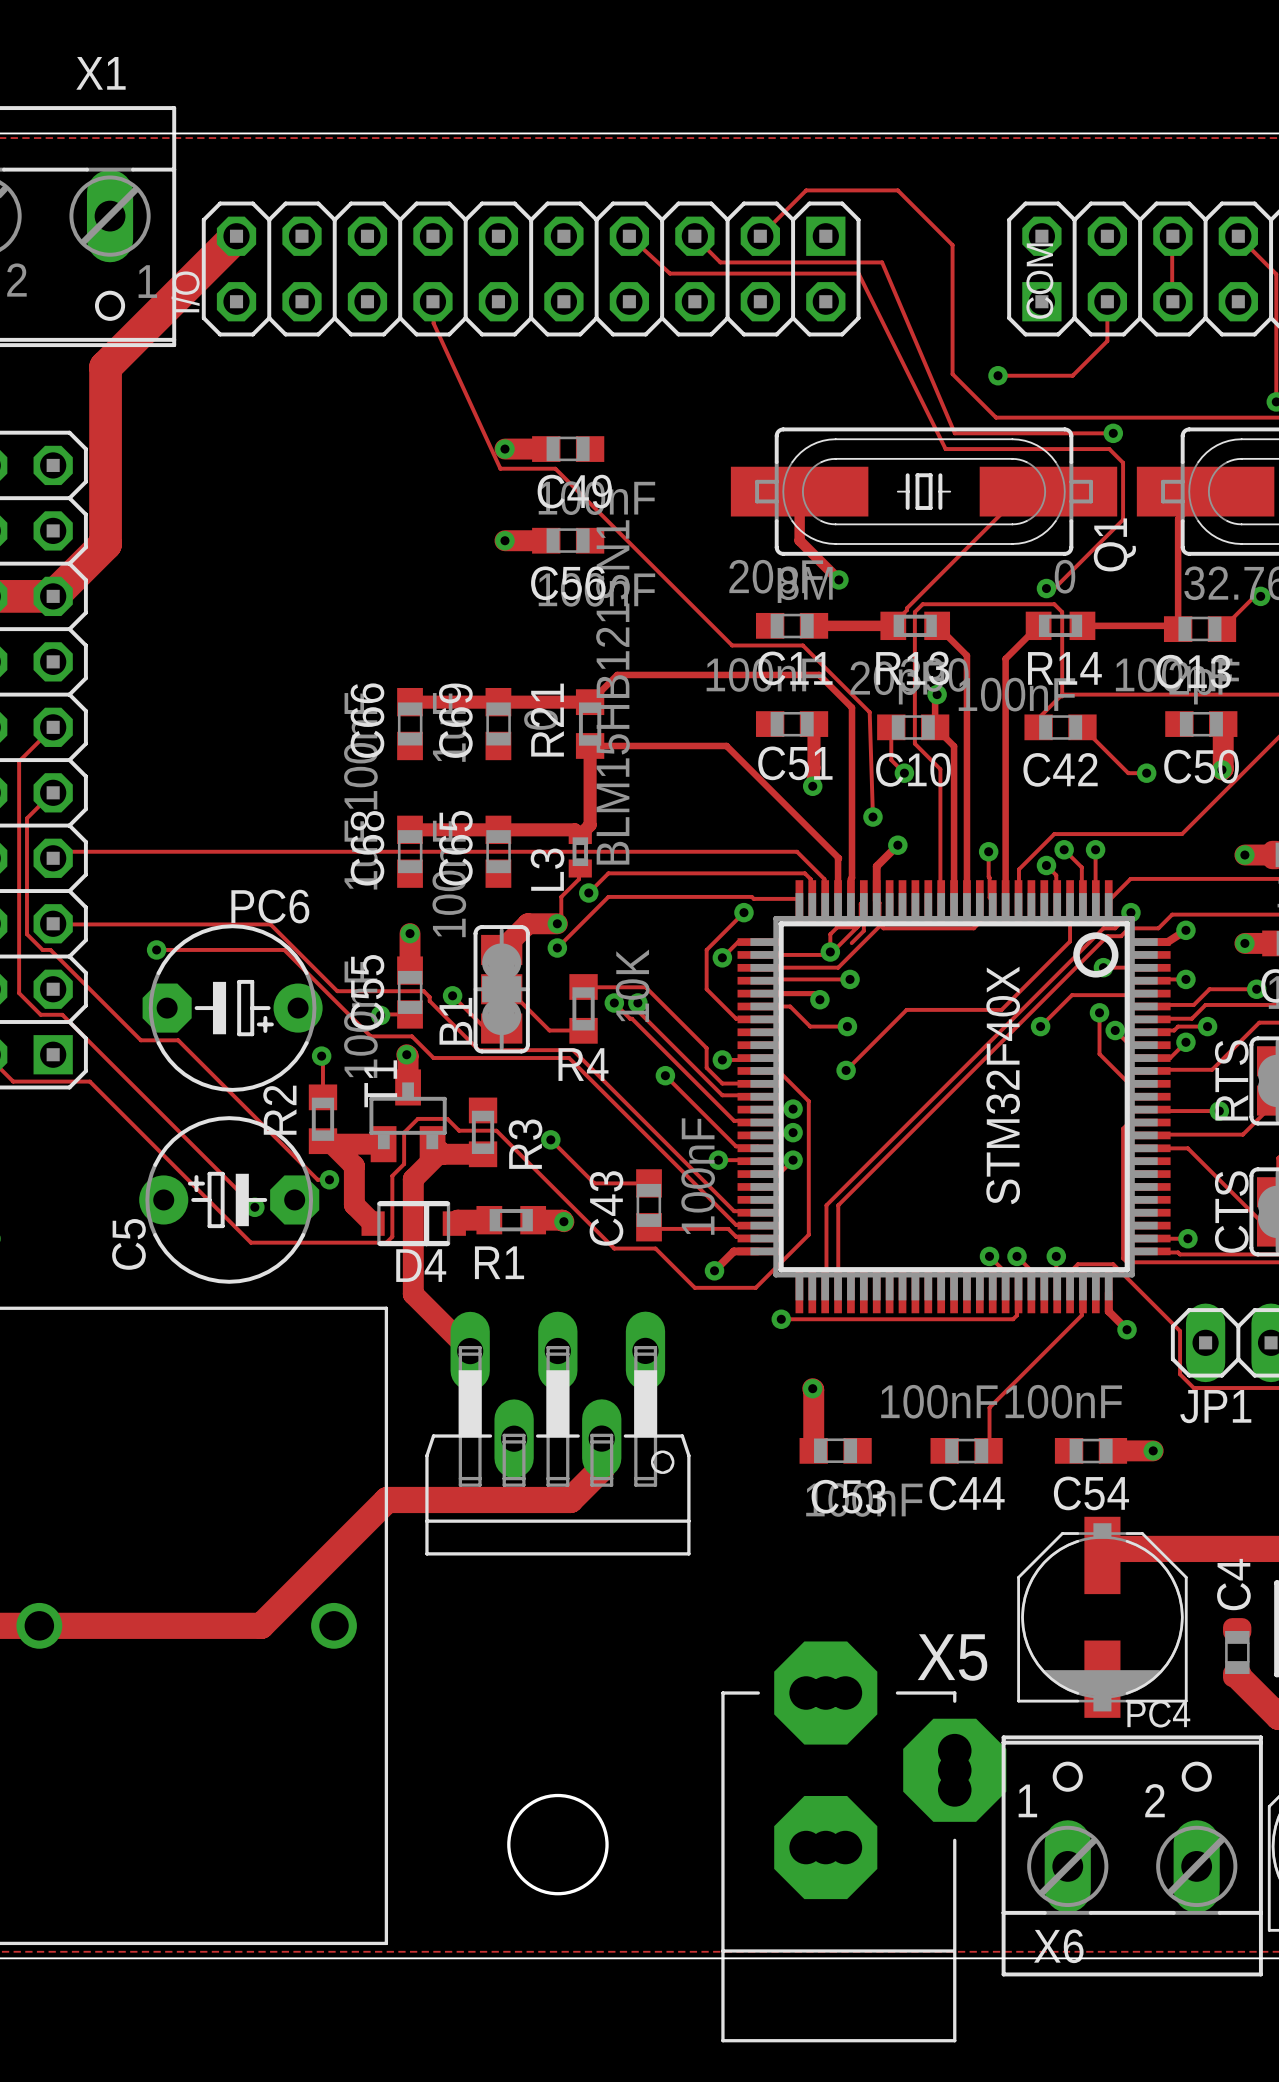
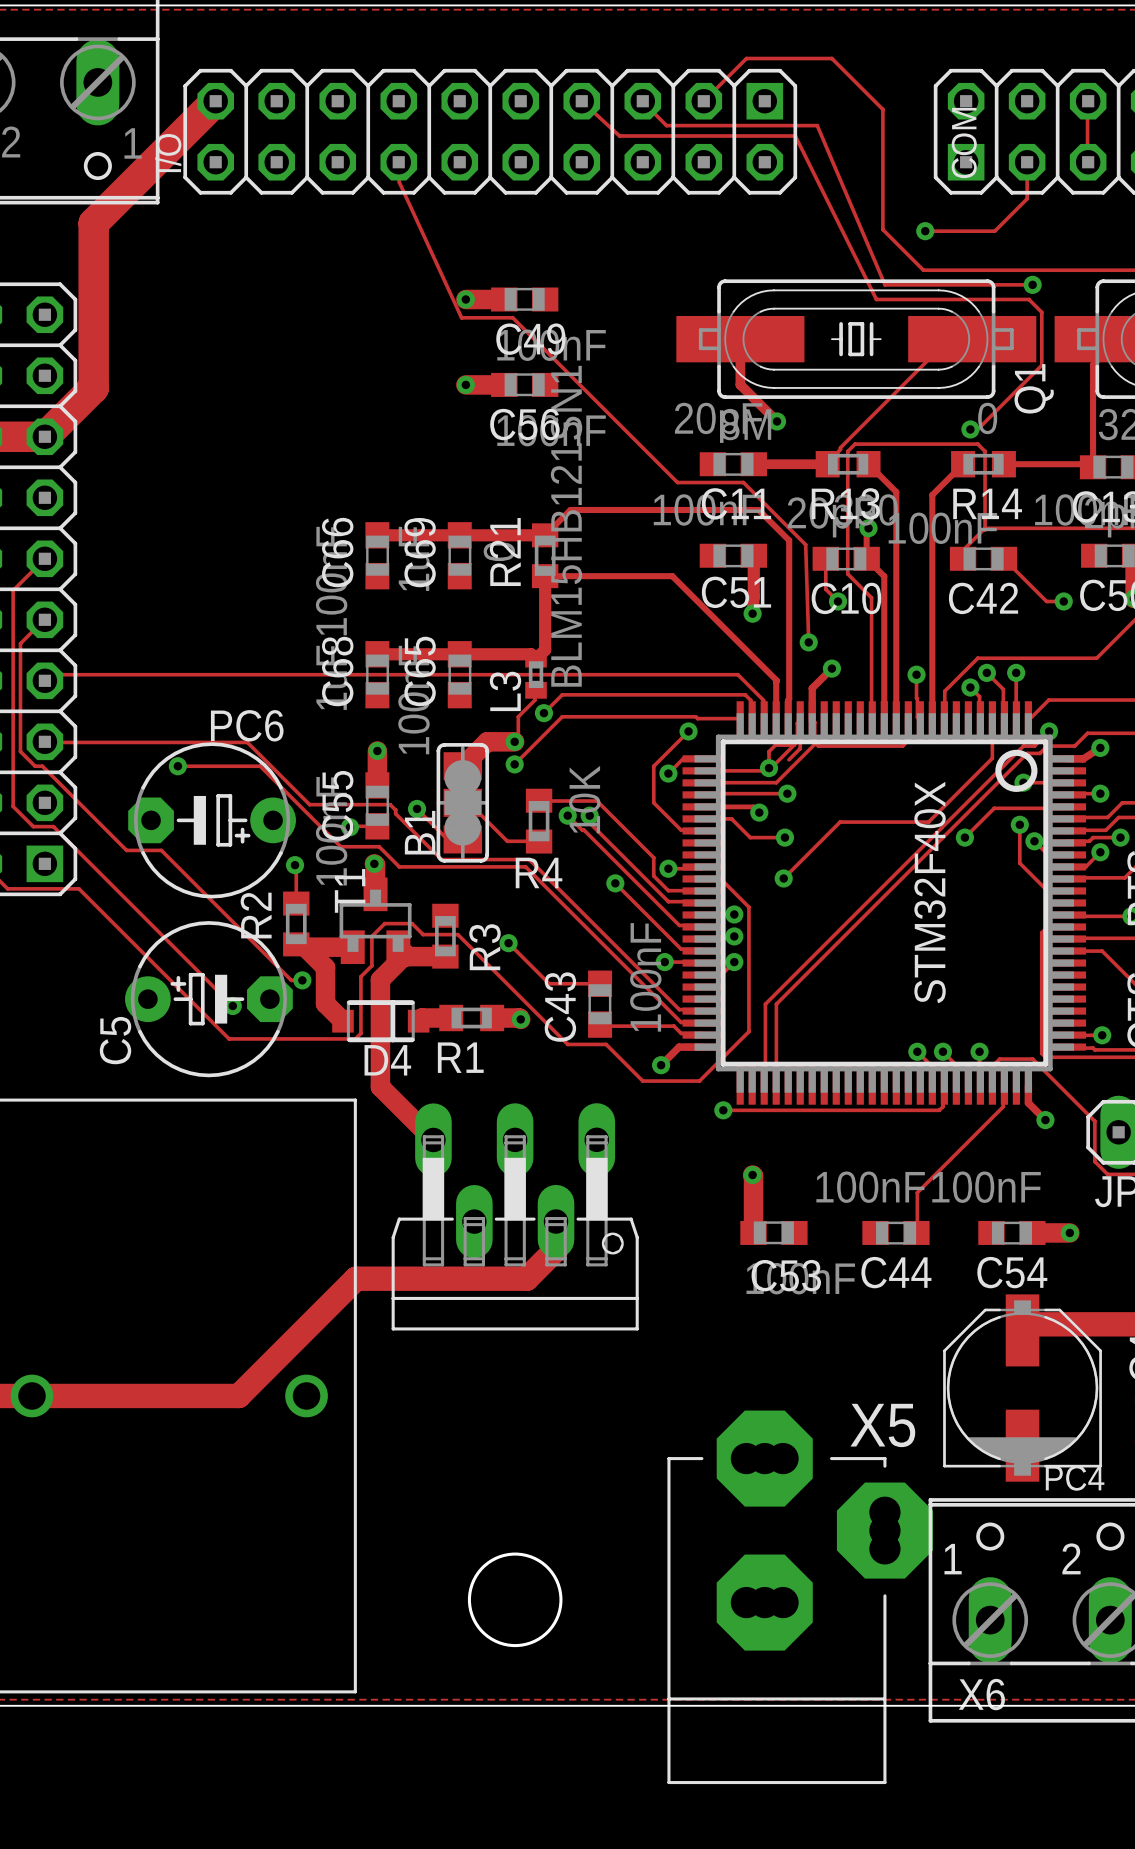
track: (156, 949) (195, 949) -> none
via position: (156, 949) -> (177, 766)

